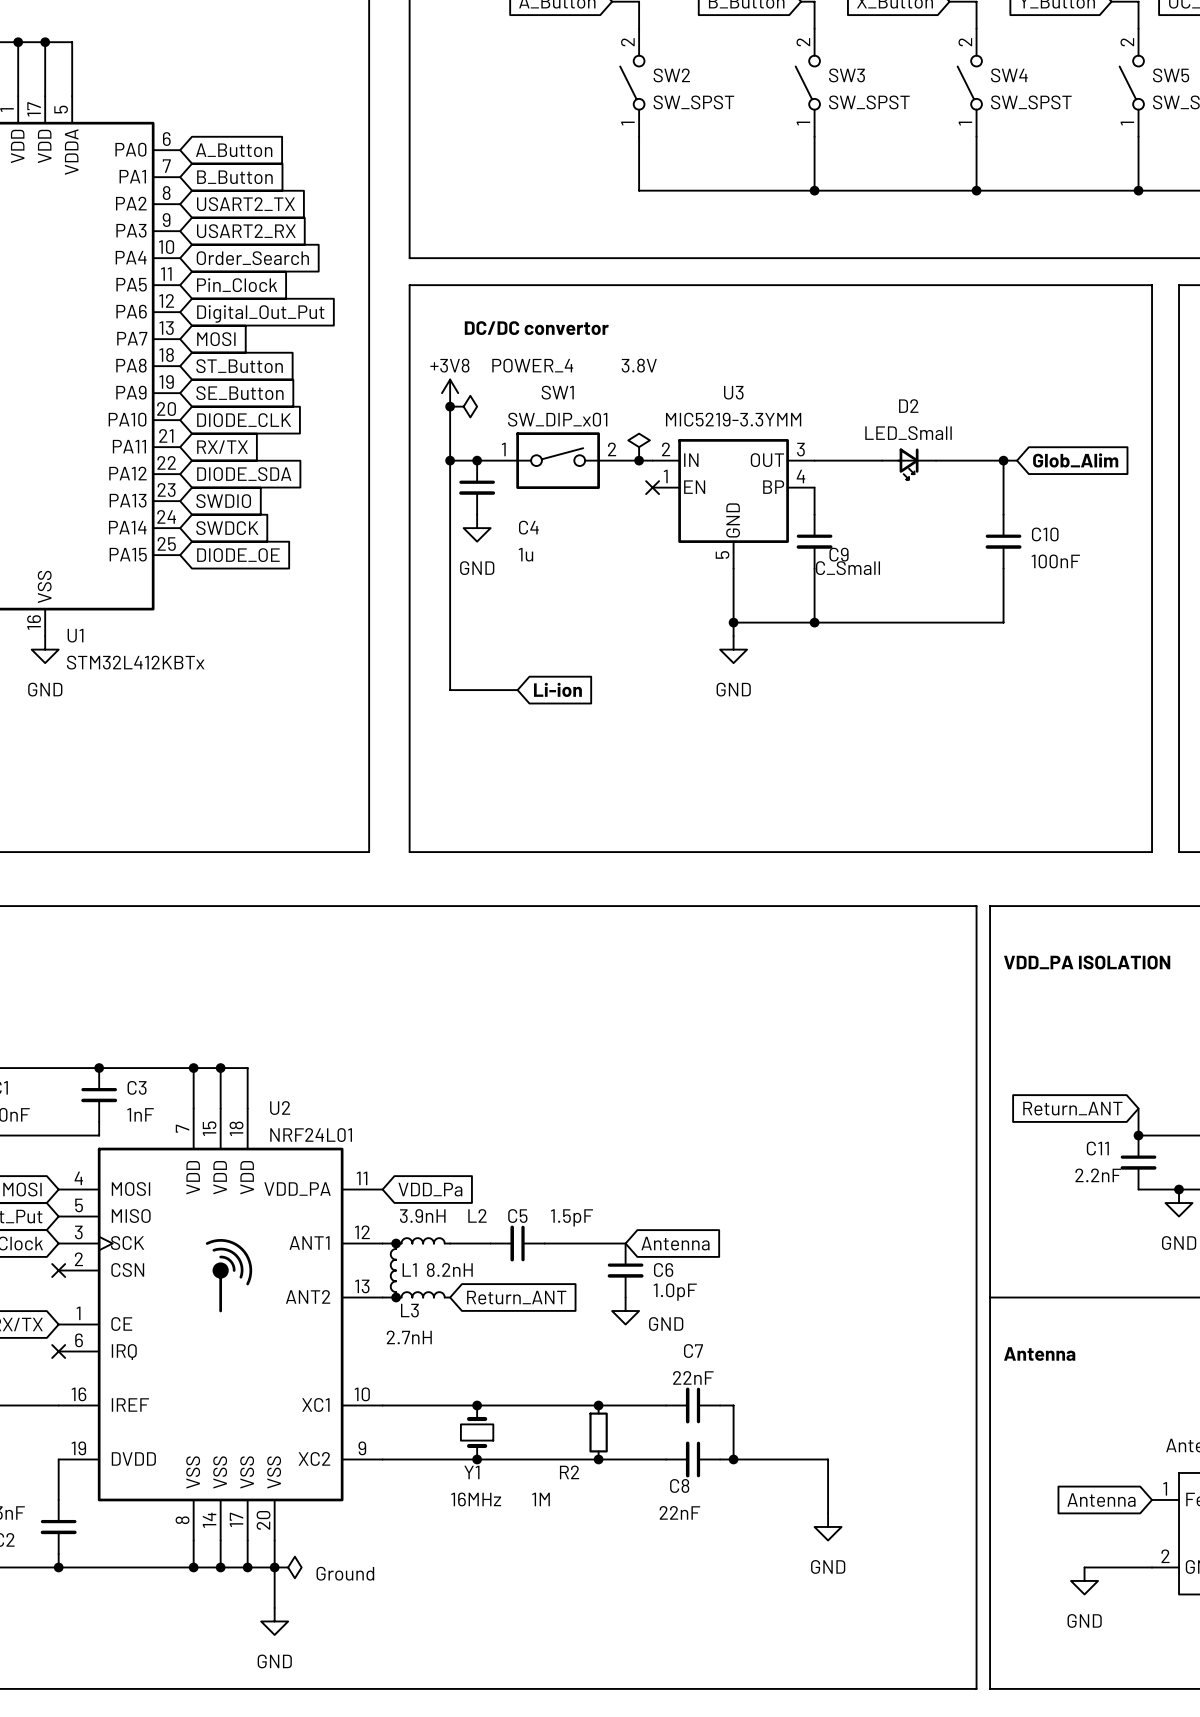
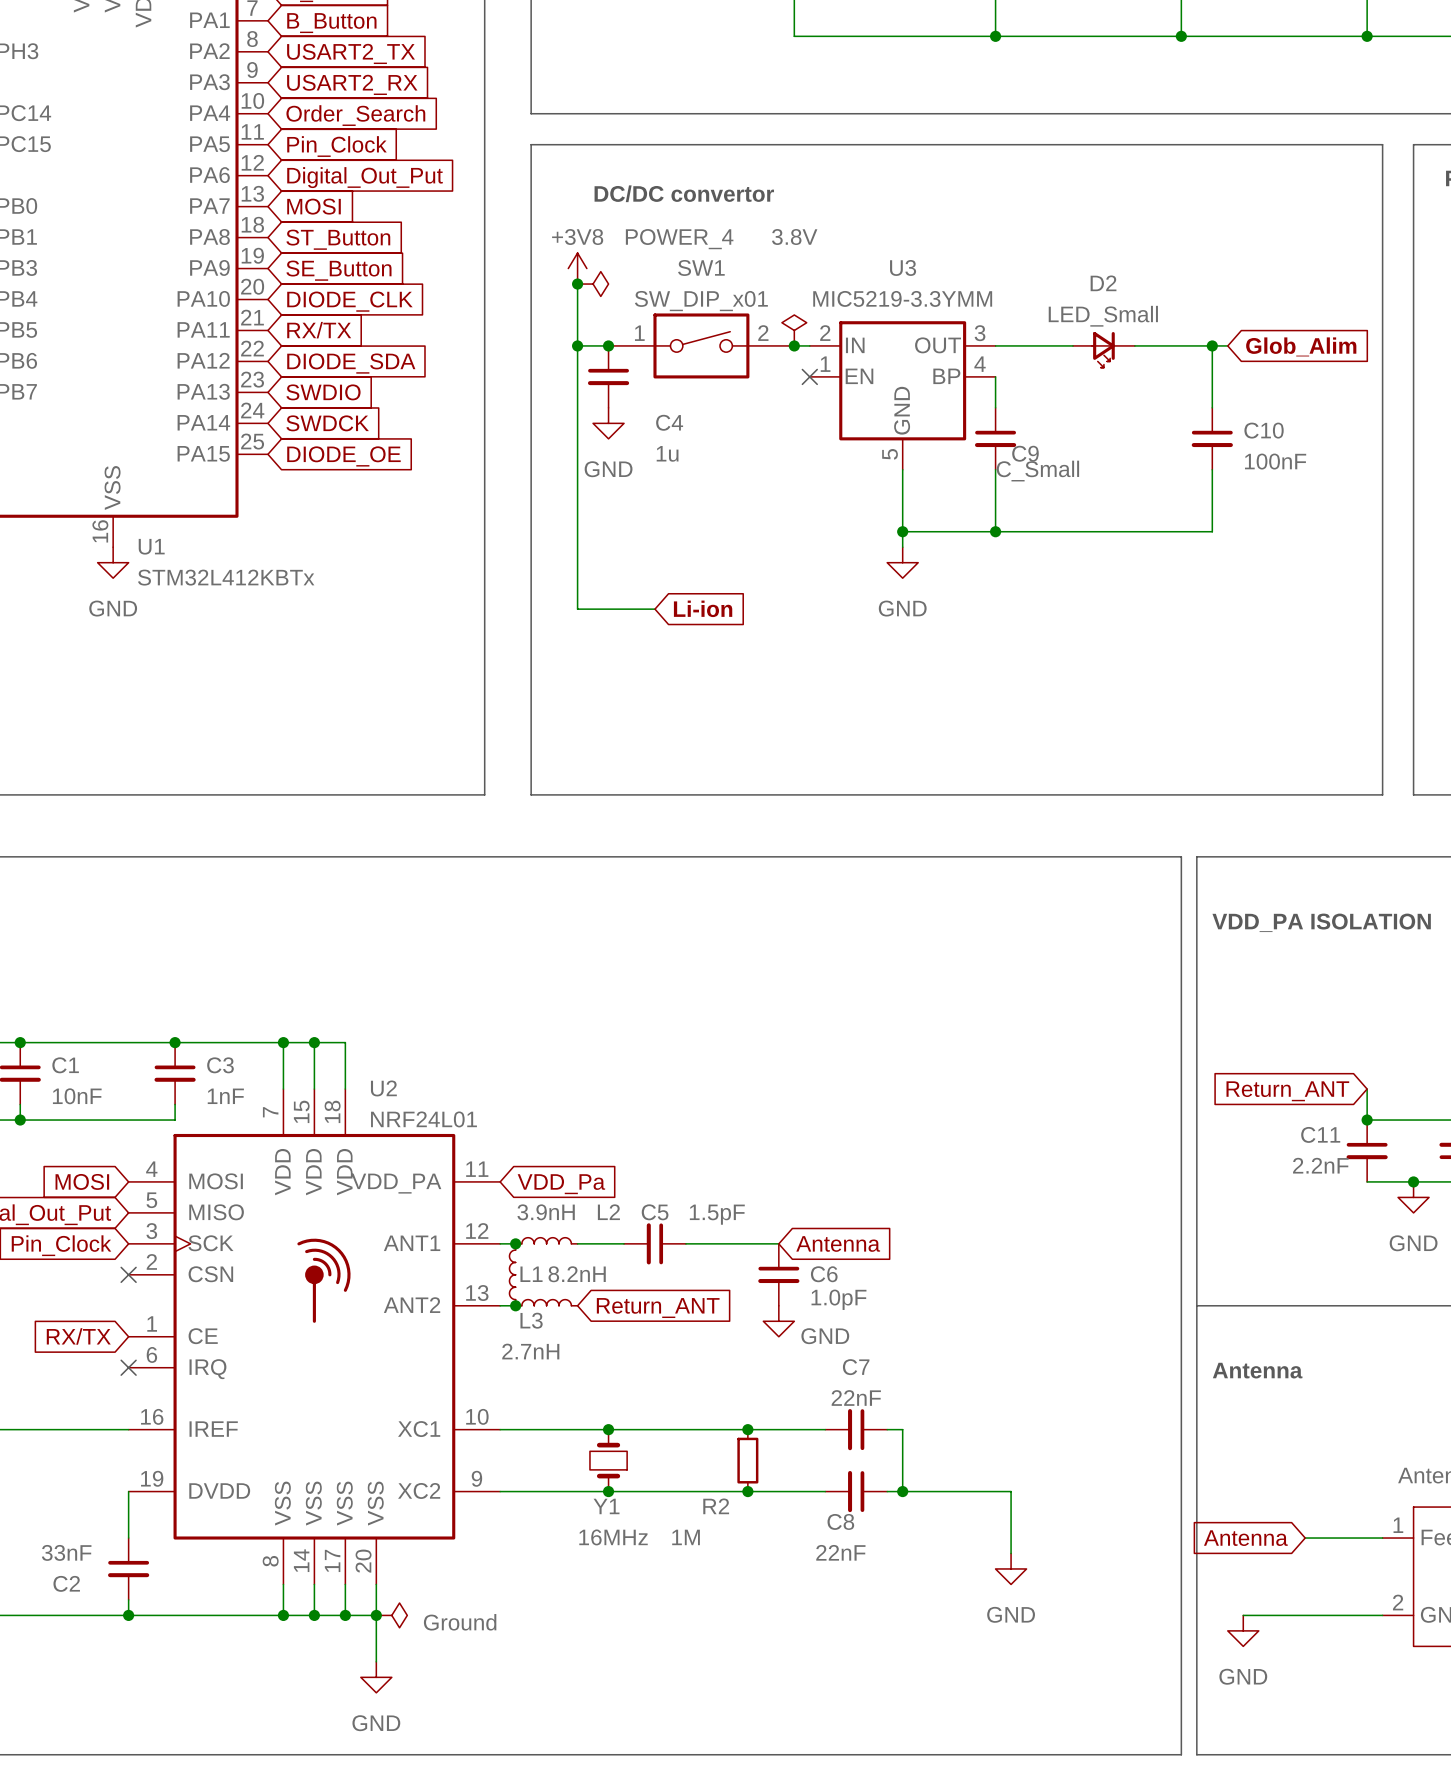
wire: none -> (1305, 1538) (1382, 1538)
global label position: Antenna (1101, 1500) -> Antenna (1245, 1538)
wire: none -> (1243, 1615) (1305, 1615)
power symbol position: GND (1084, 1580) -> GND (1243, 1630)

